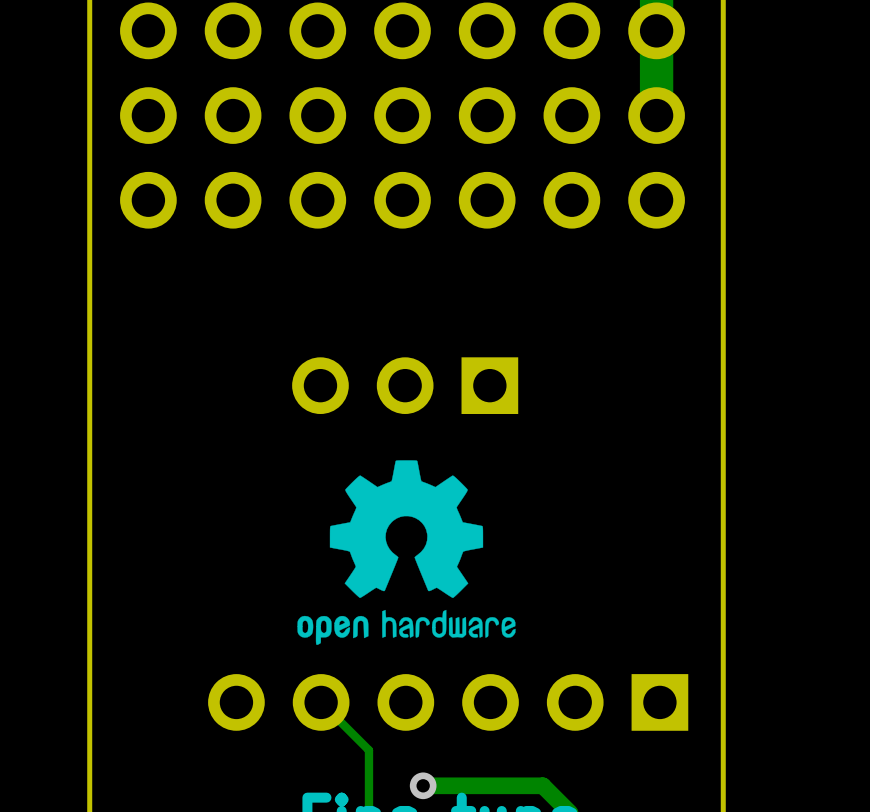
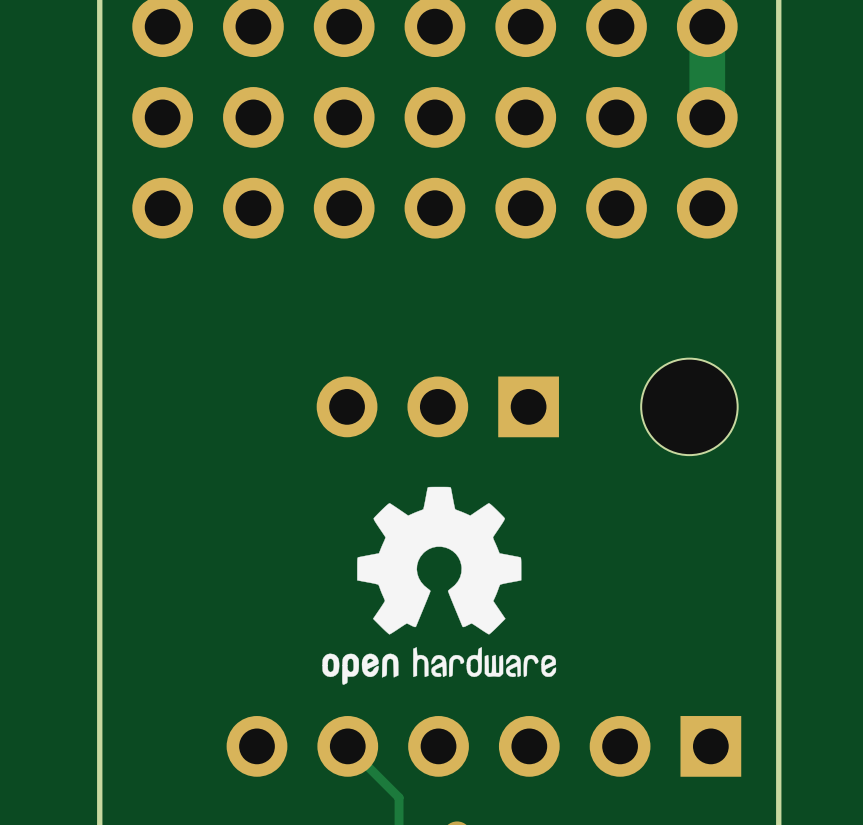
part: none -> (689, 406)

